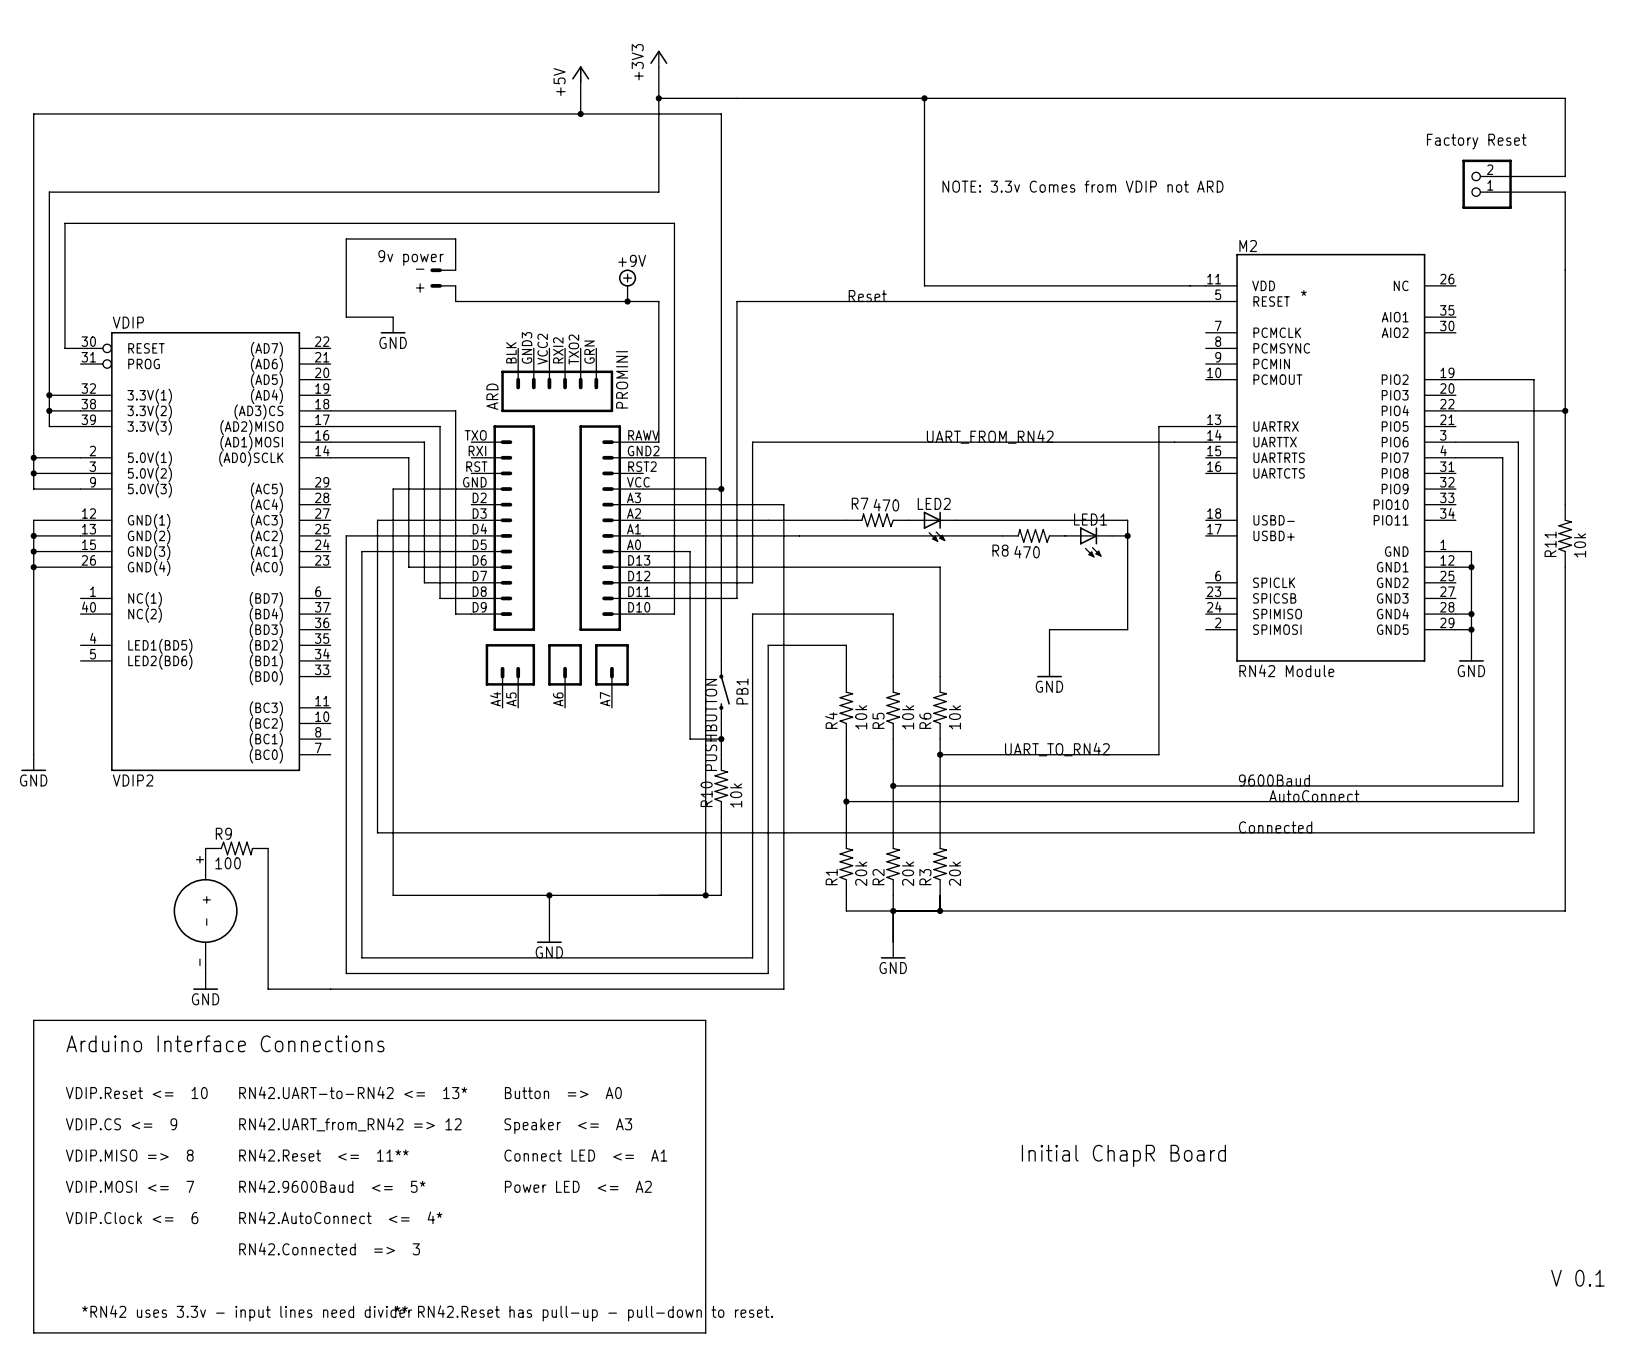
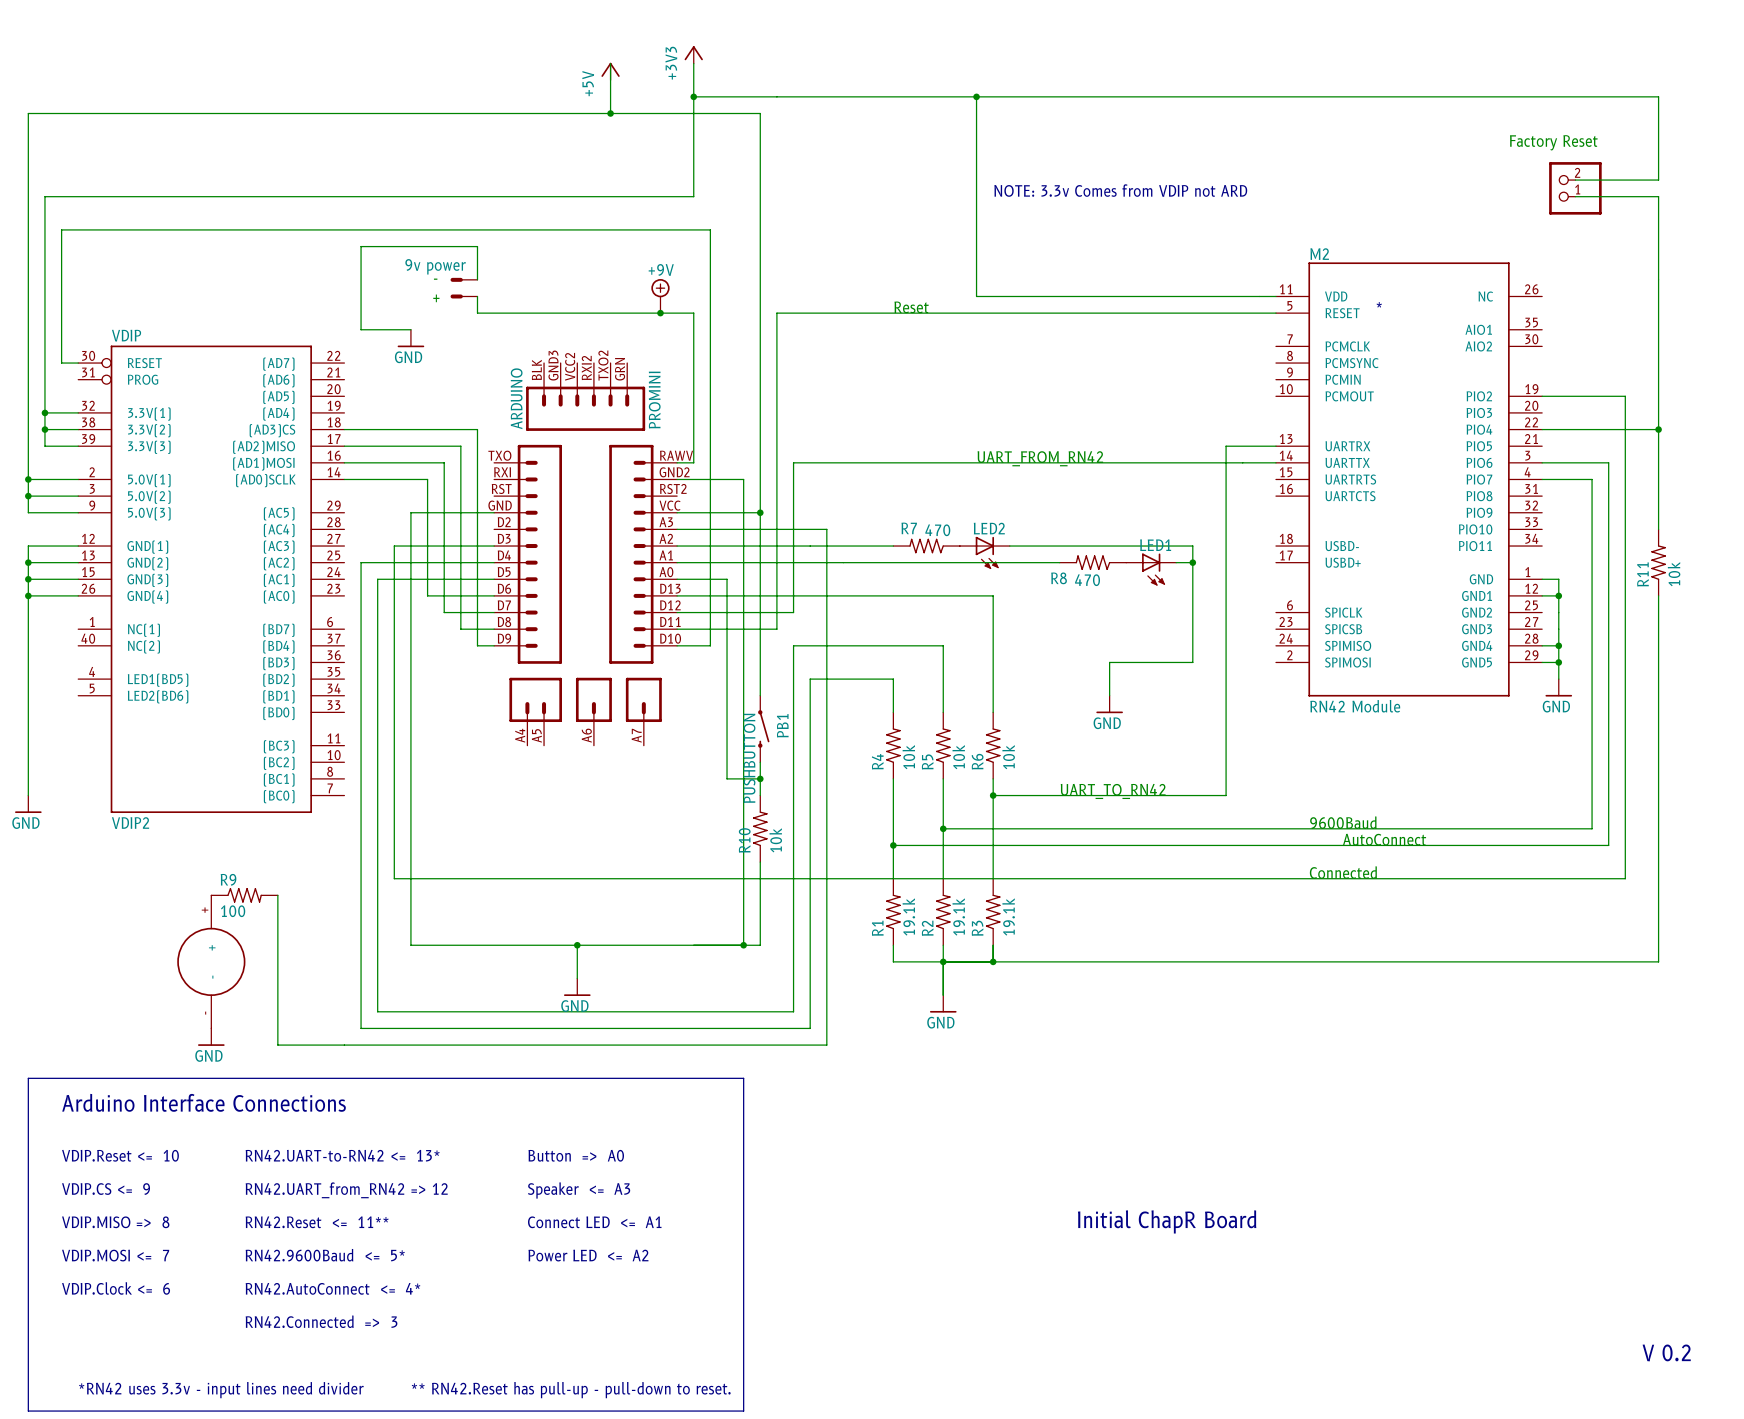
ARD name: ARD (492, 396) -> ARDUINO (516, 398)
R1 value: 20k (861, 873) -> 19.1k (908, 916)
R2 value: 20k (908, 873) -> 19.1k (958, 916)
R3 value: 20k (954, 873) -> 19.1k (1008, 916)
text: V 0.1 (1577, 1278) -> V 0.2 (1666, 1352)

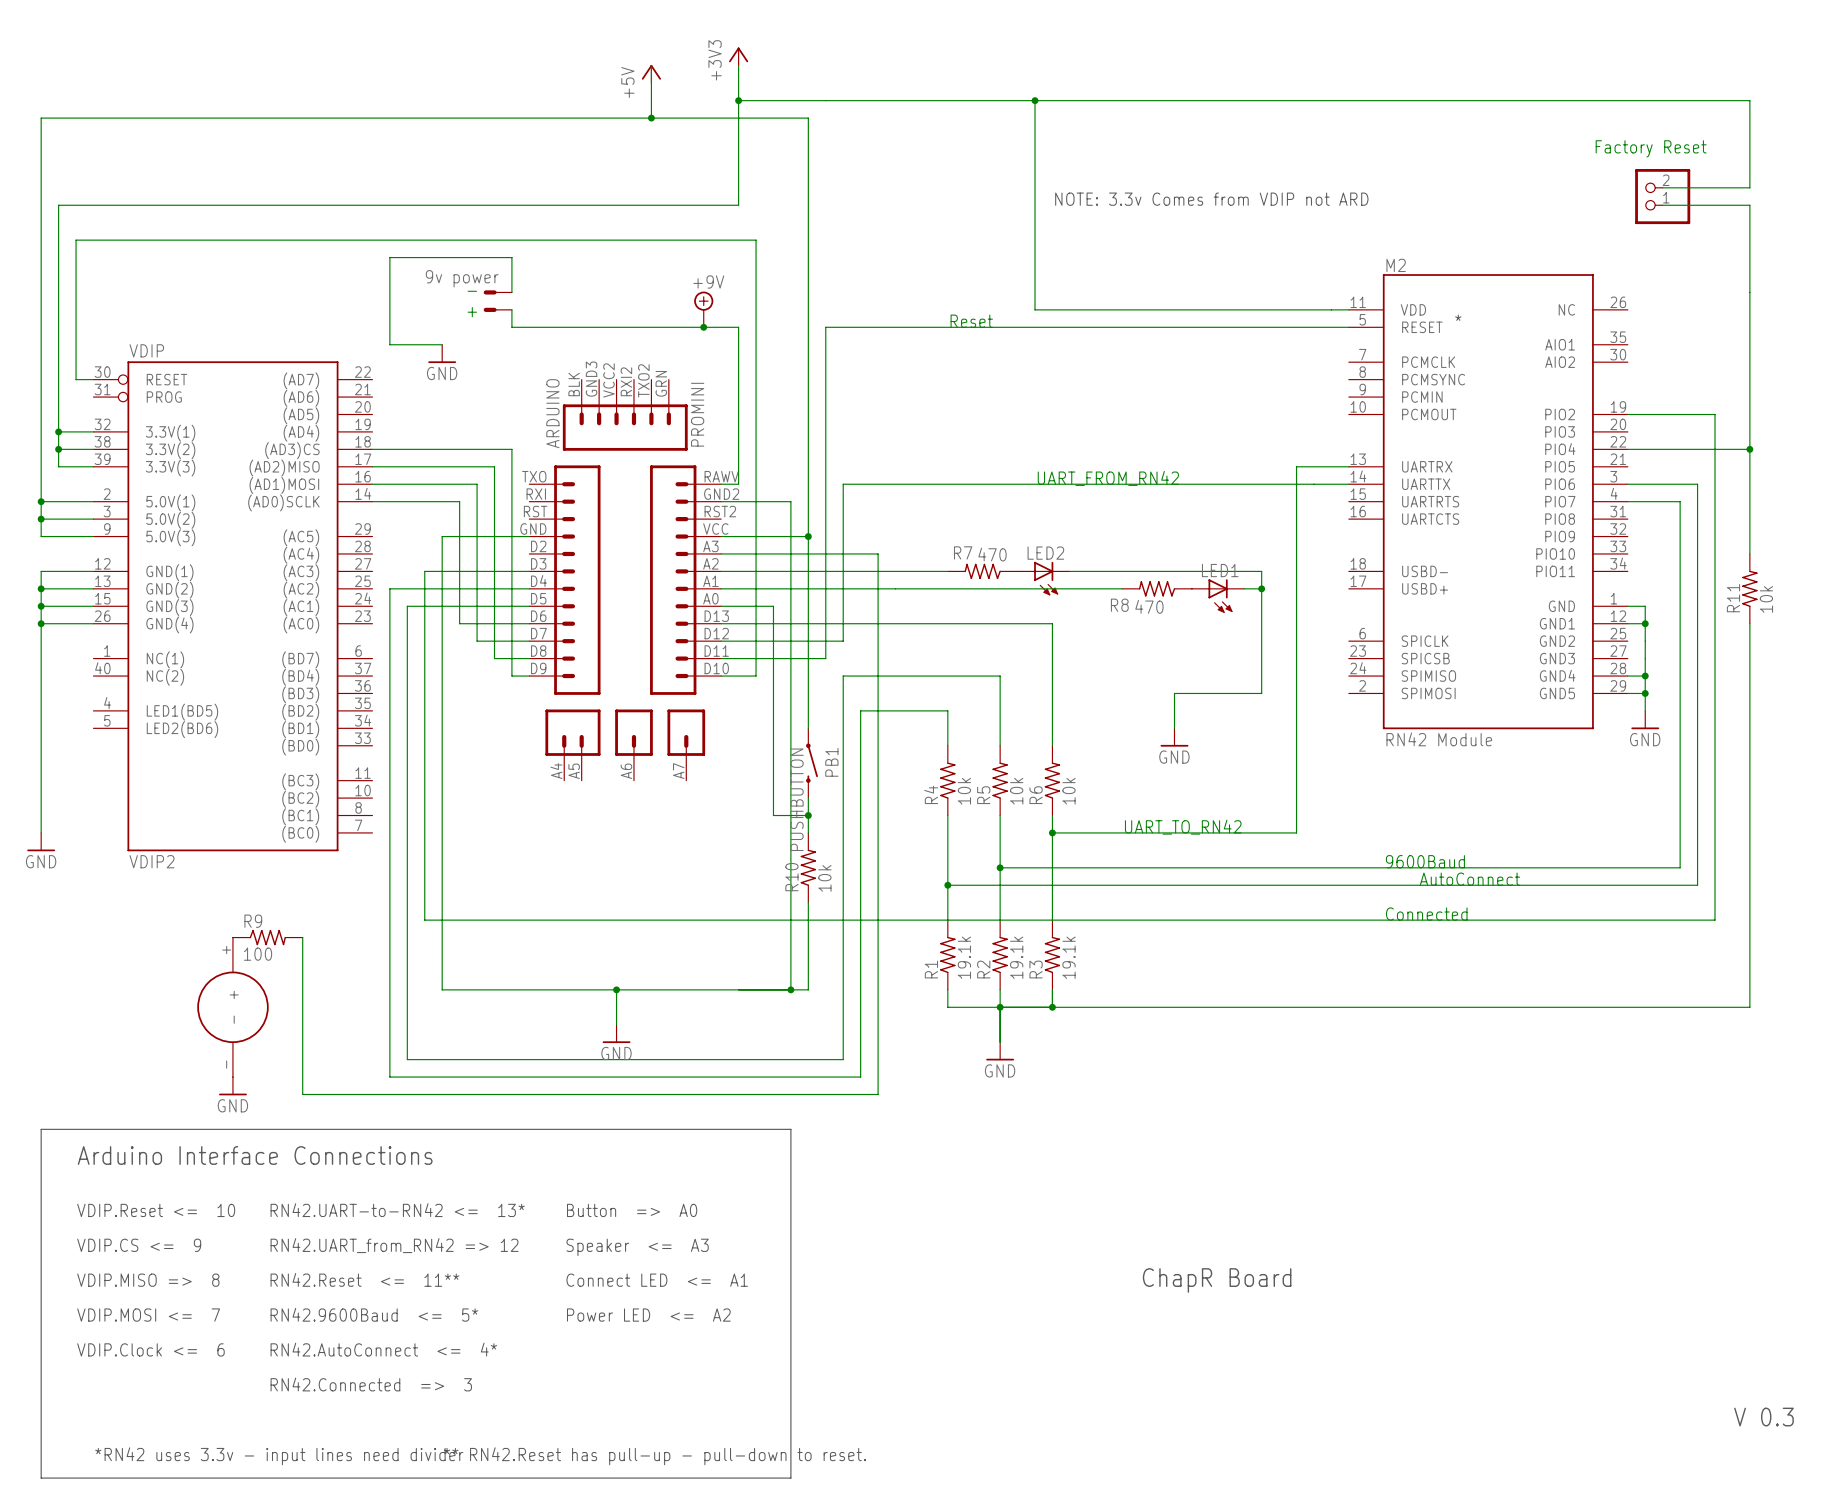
text: Initial ChapR Board (1167, 1221) -> ChapR Board (1217, 1280)
text: V 0.2 (1666, 1352) -> V 0.3 (1763, 1417)

